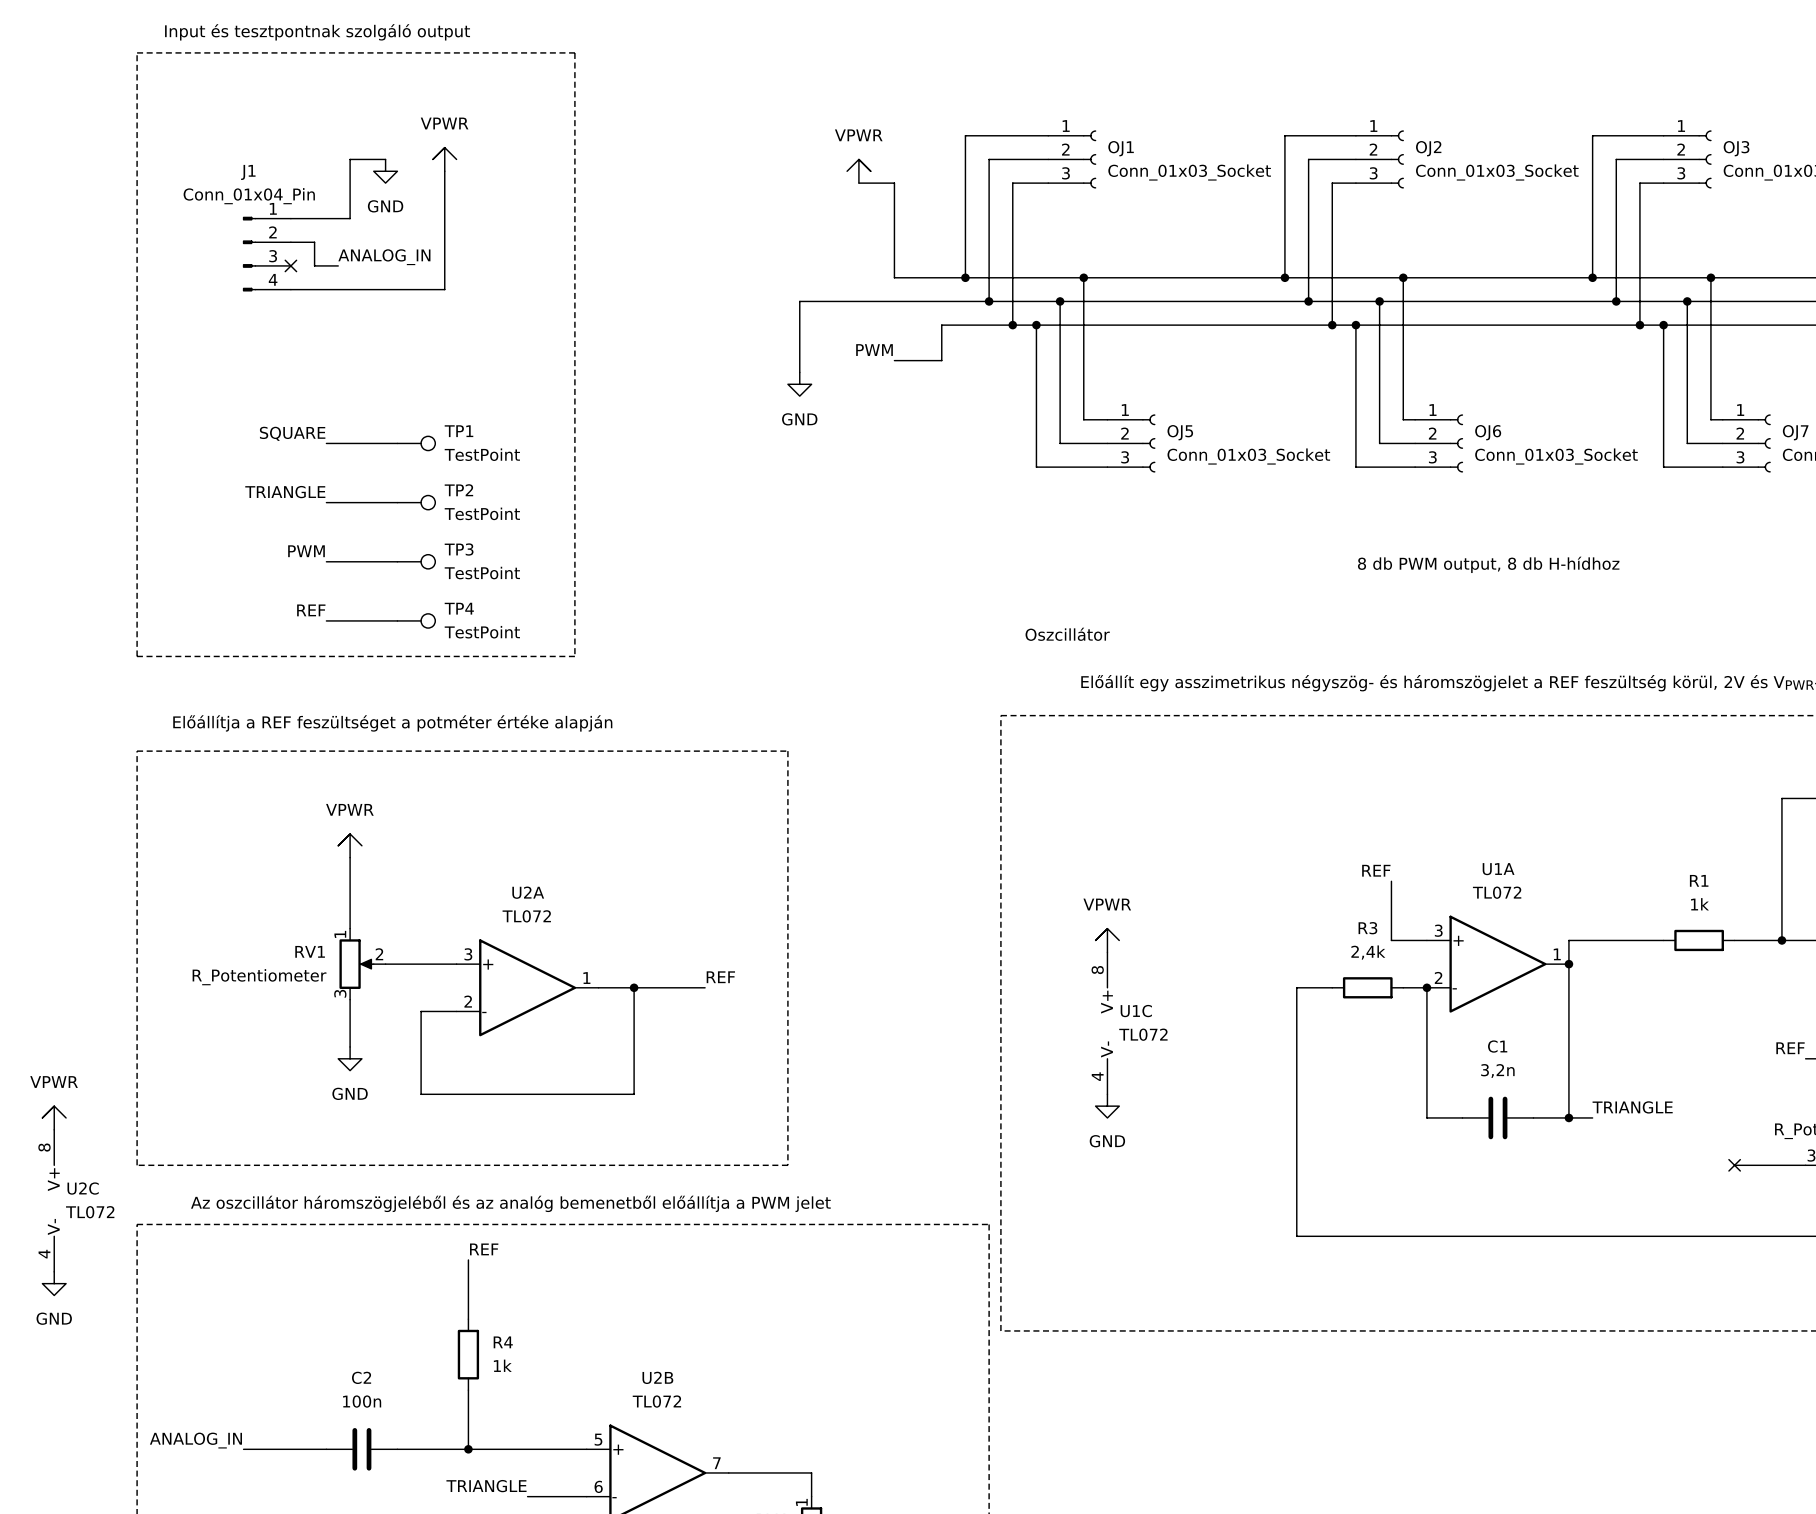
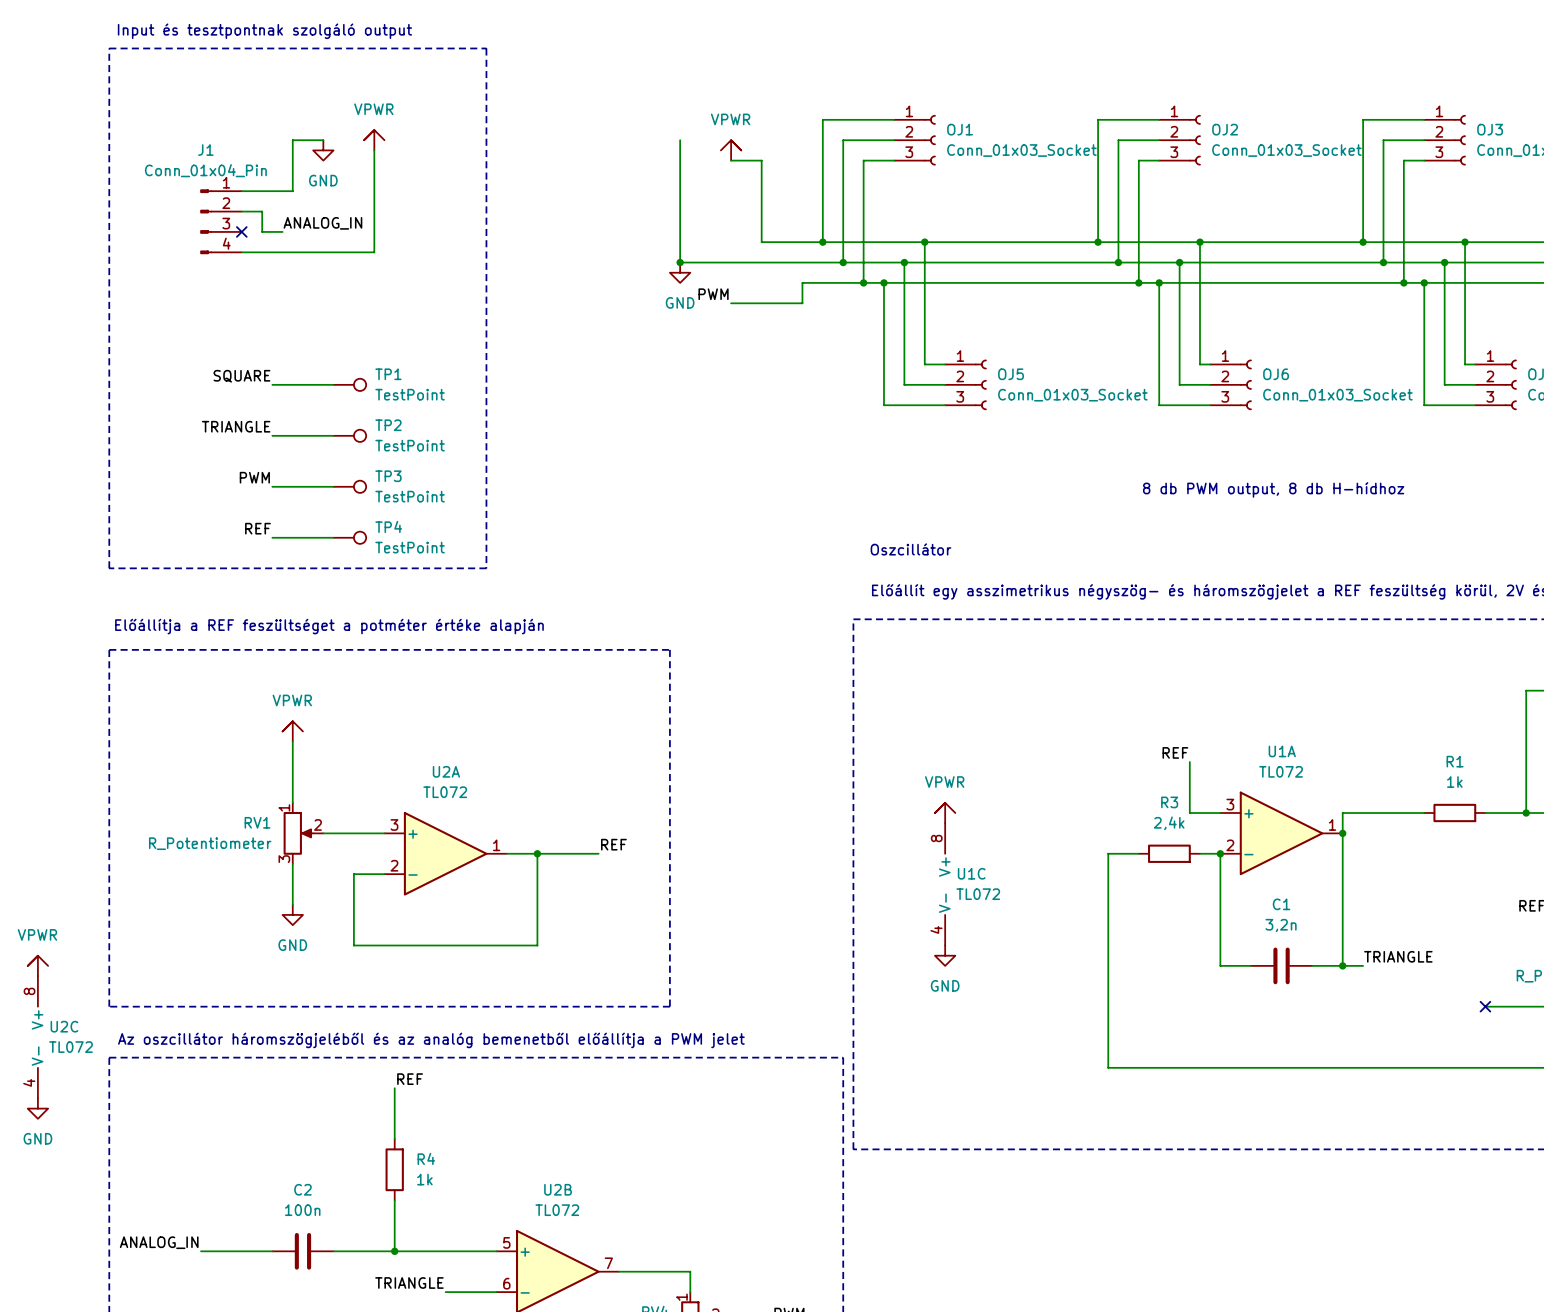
wire: (799, 301) (799, 372) -> (680, 262) (680, 140)
junction: none -> (680, 262)
wire: (941, 348) (941, 360) (894, 360) -> (802, 303) (731, 303)
label position: PWM (874, 350) -> PWM (713, 294)
power symbol position: GND (799, 384) -> GND (680, 272)

